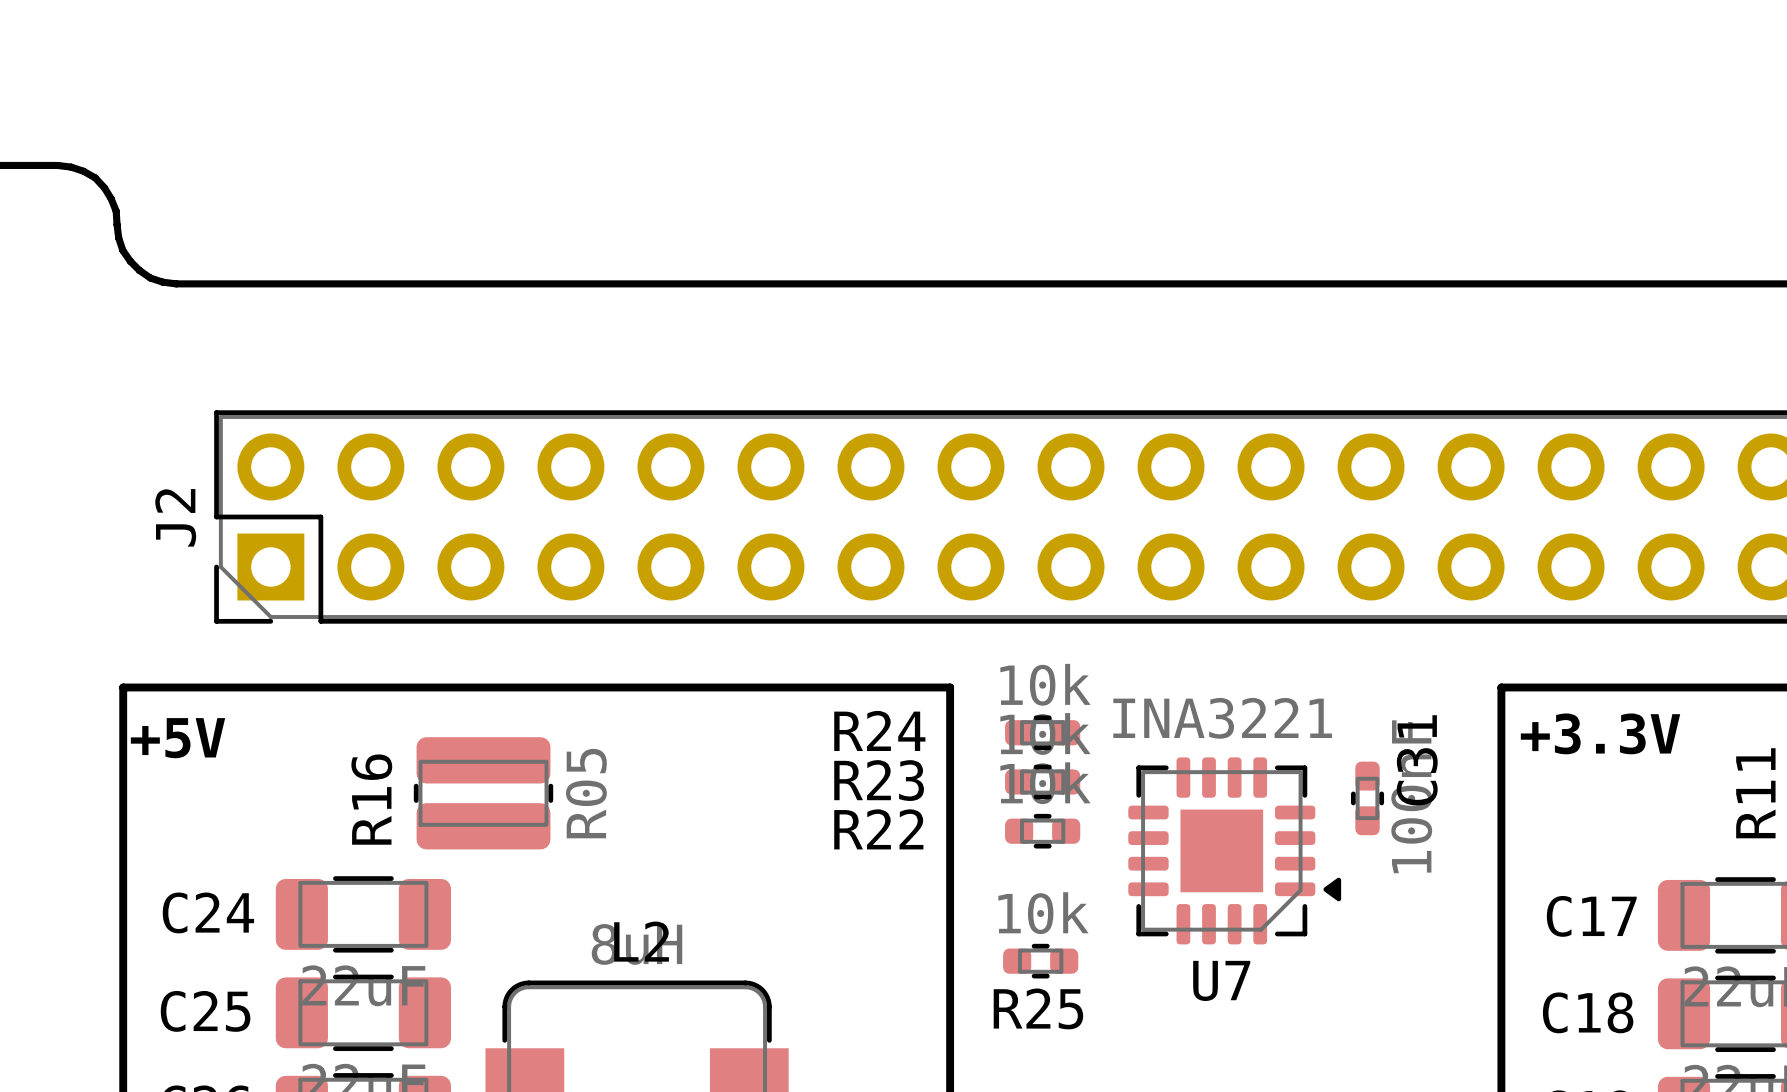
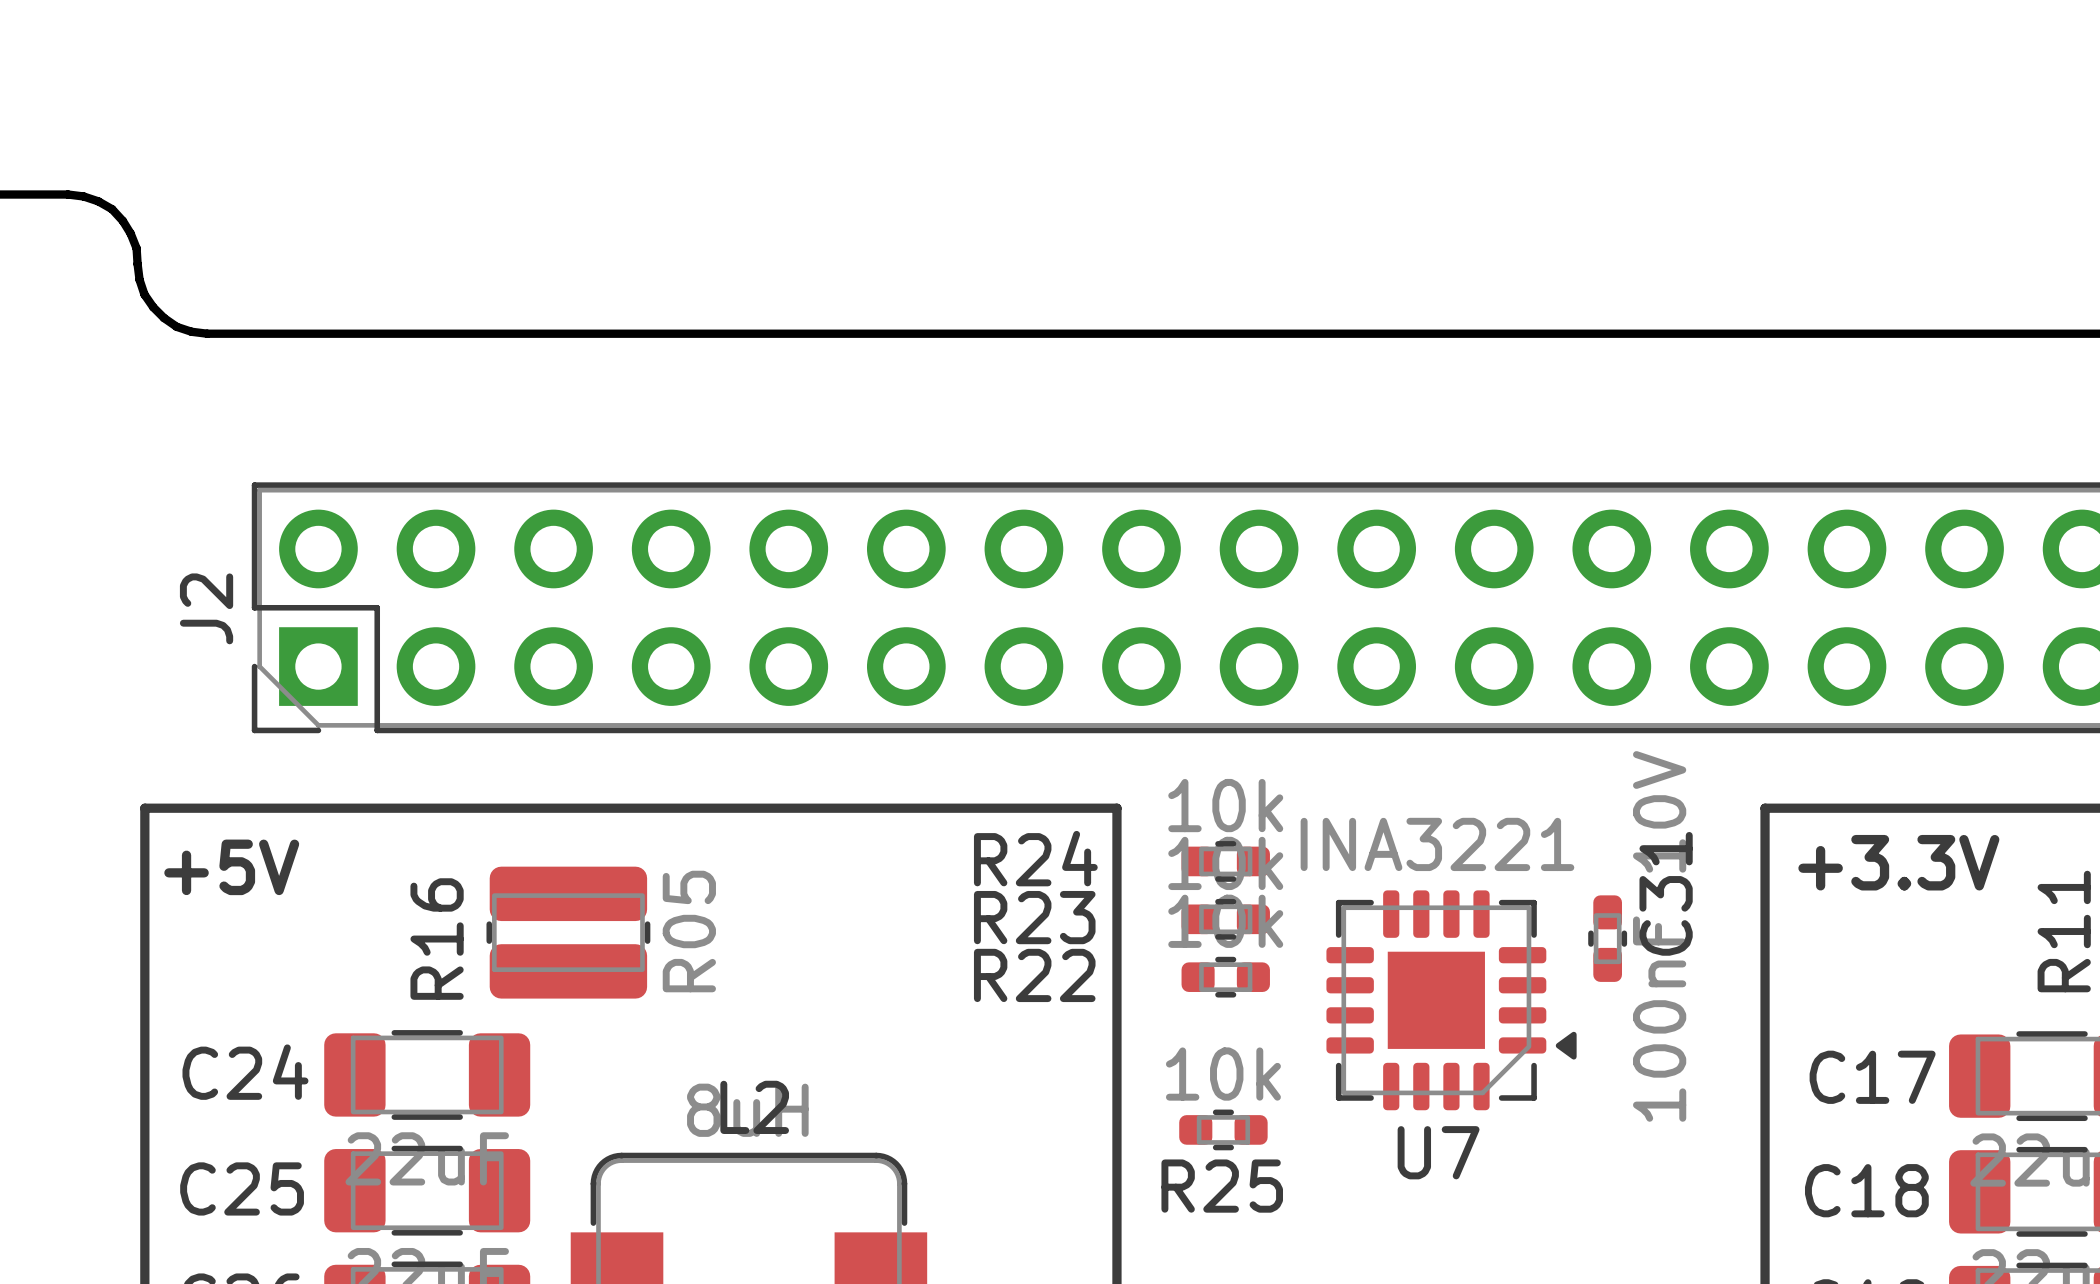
C31 value: 100nF (1411, 796) -> 100nF 10V (1659, 936)

